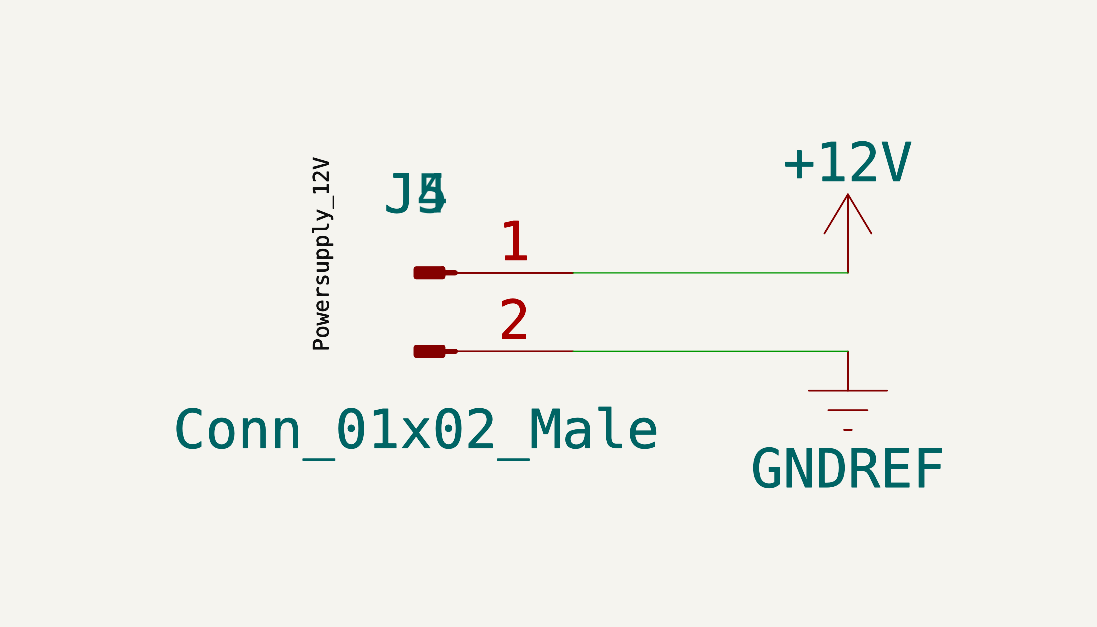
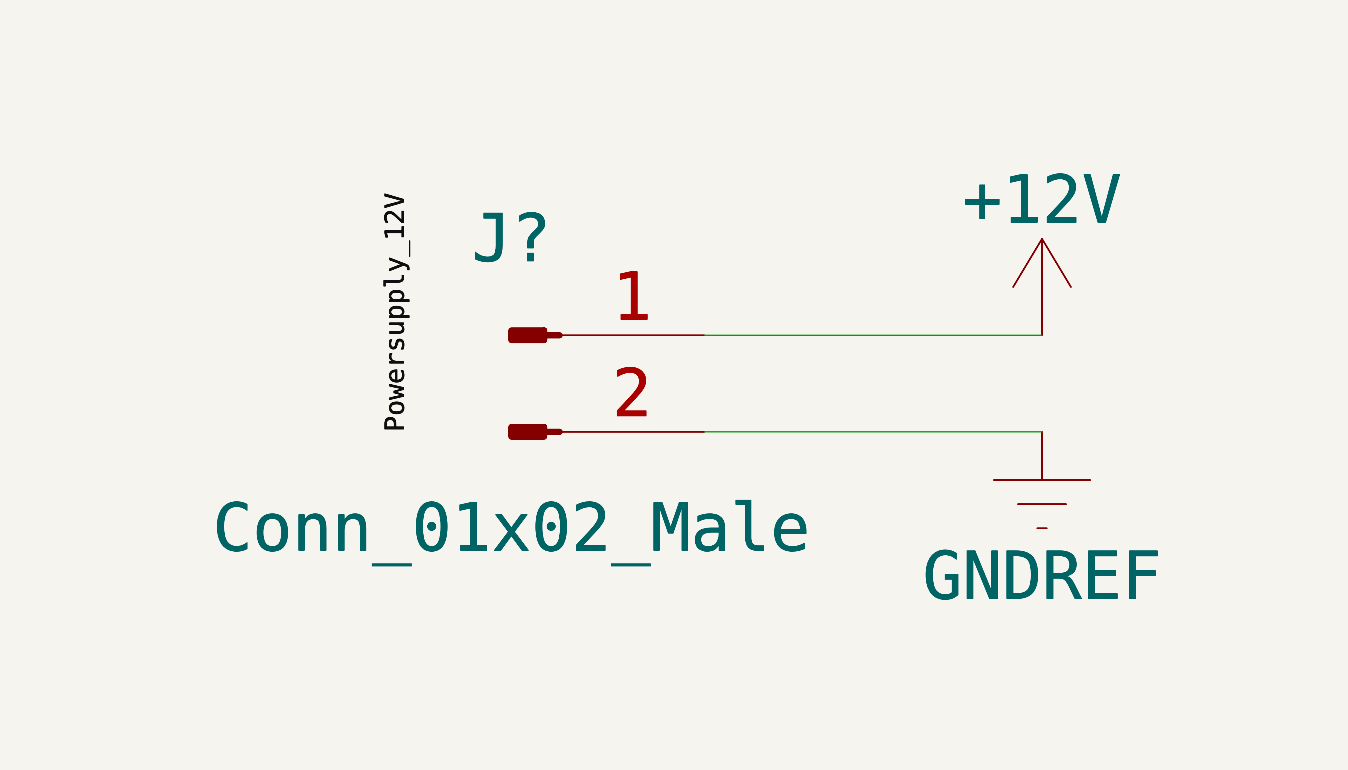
part: Conn_01x02_Male (493, 312) -> none
part: Conn_01x02_Male (493, 312) -> none
J?: none -> Conn_01x02_Male (606, 383)

